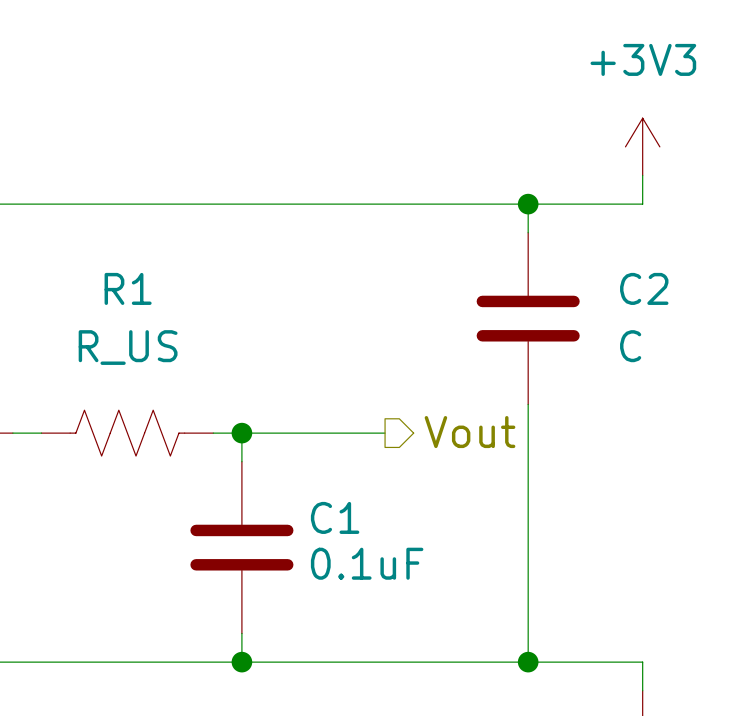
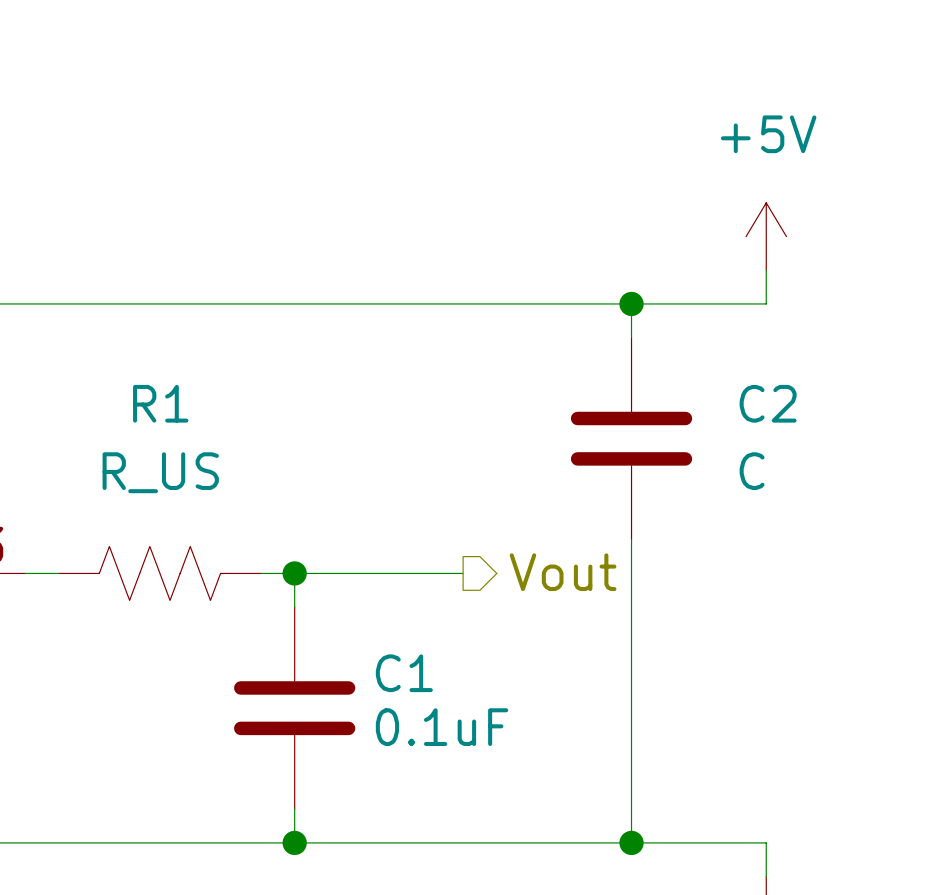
power symbol: +3V3 (642, 146) -> +5V (766, 236)

